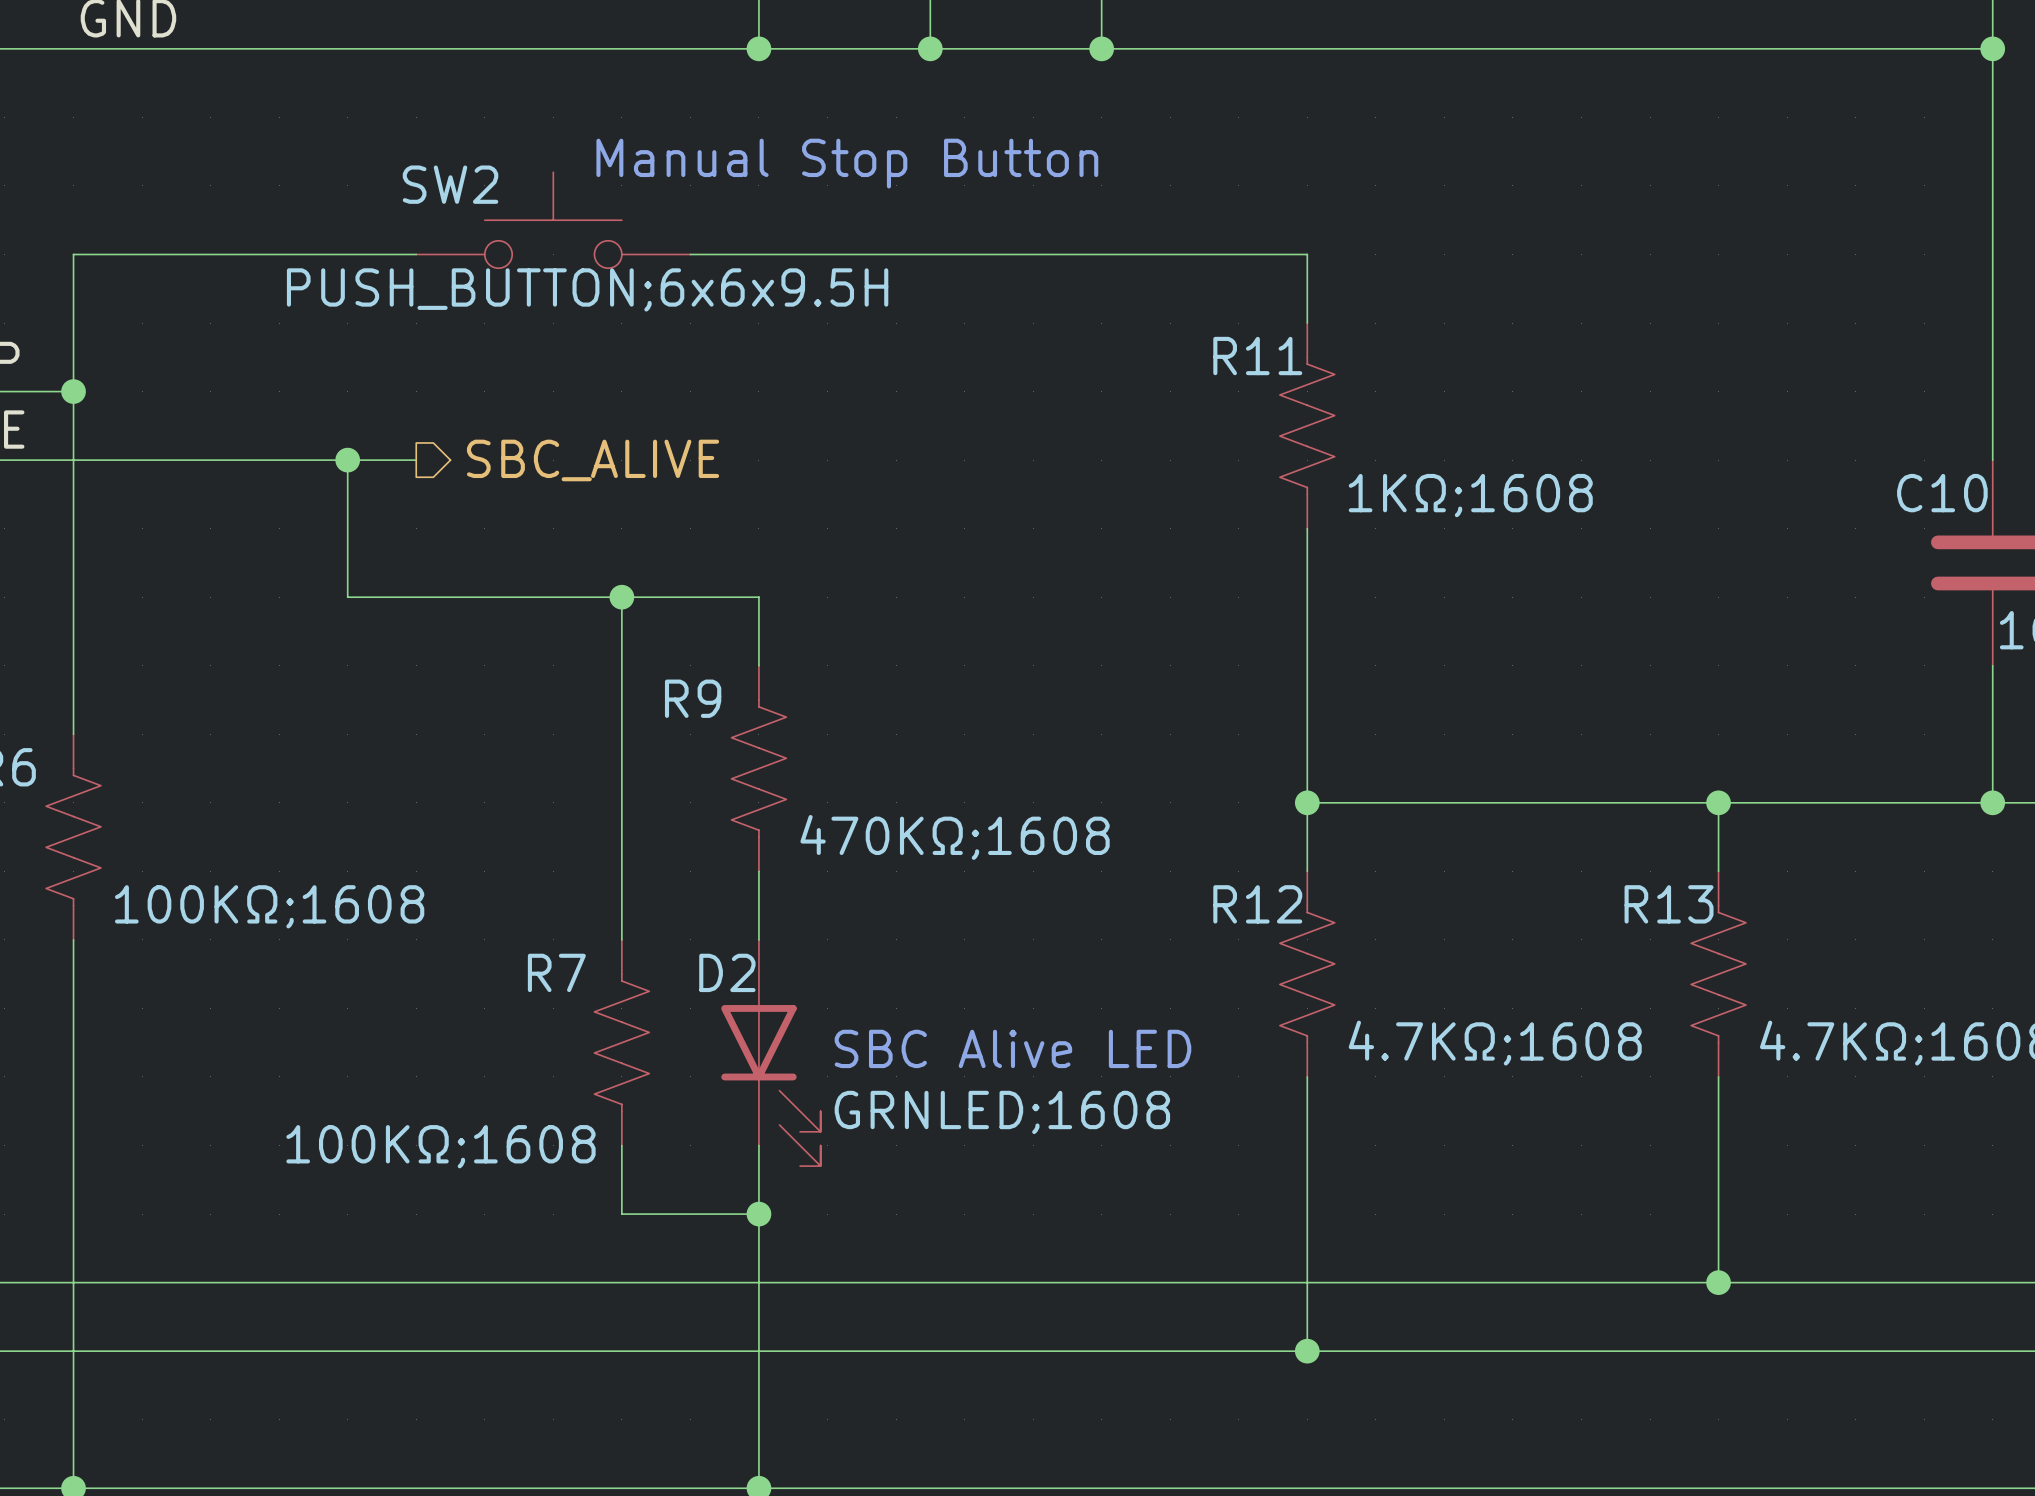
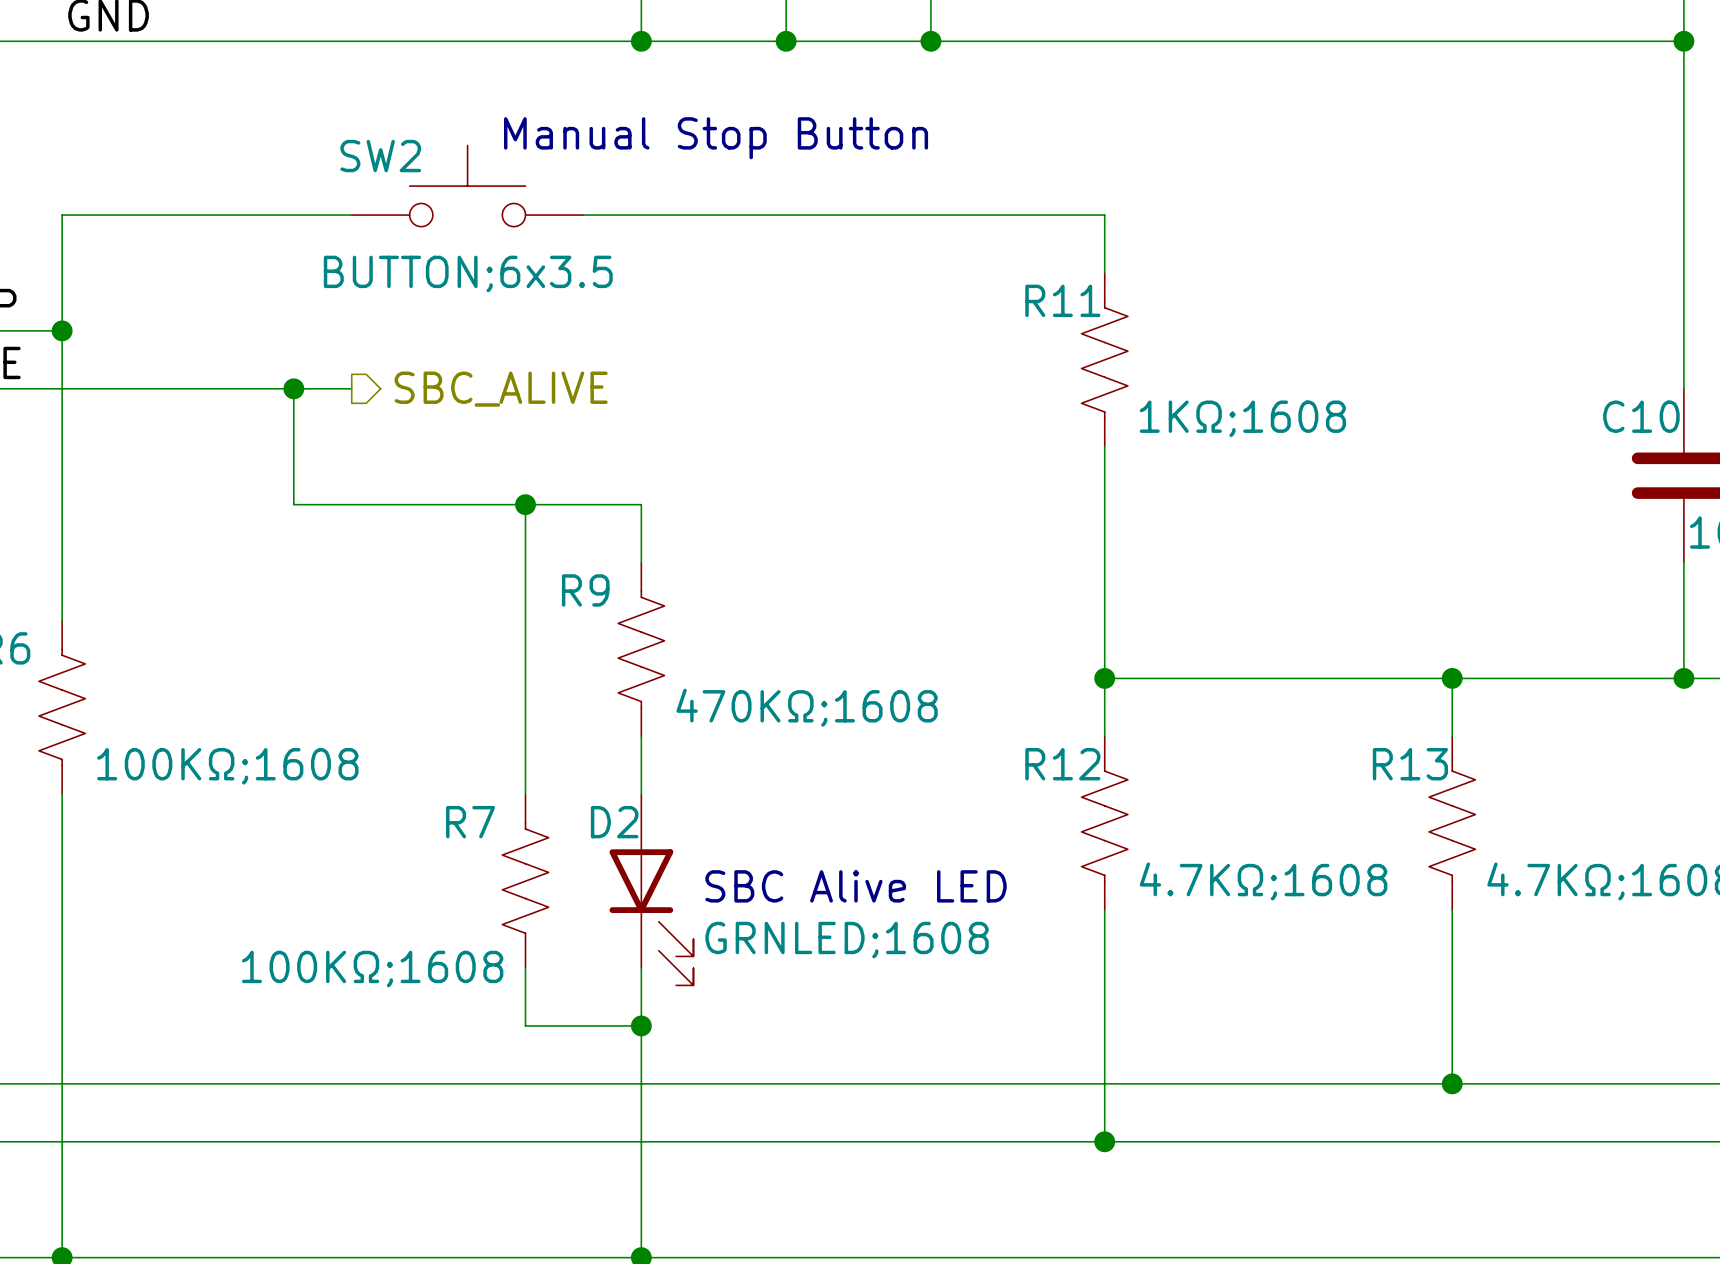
SW2 value: PUSH_BUTTON;6x6x9.5H (587, 289) -> BUTTON;6x3.5 (468, 273)

